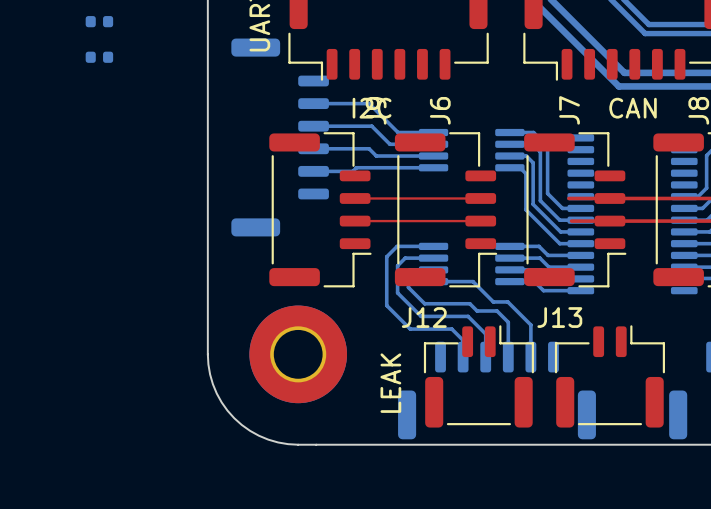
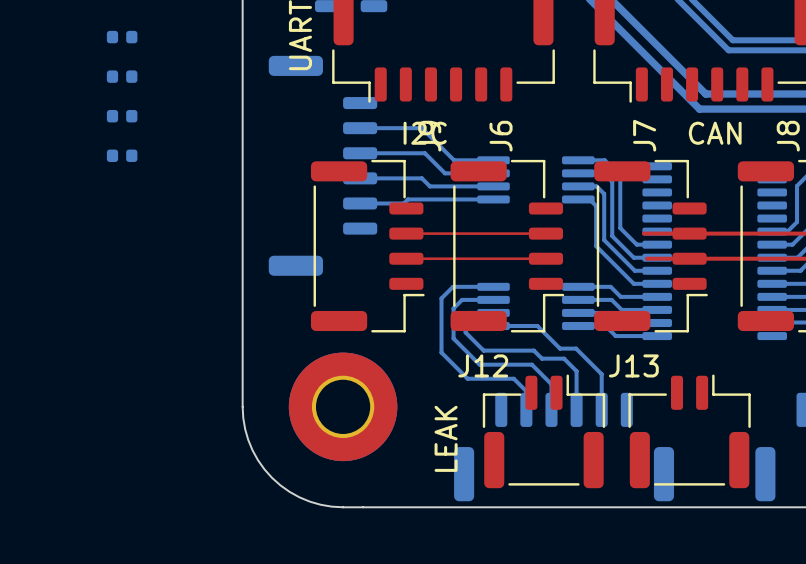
part: none -> (122, 116)
part: none -> (122, 155)

